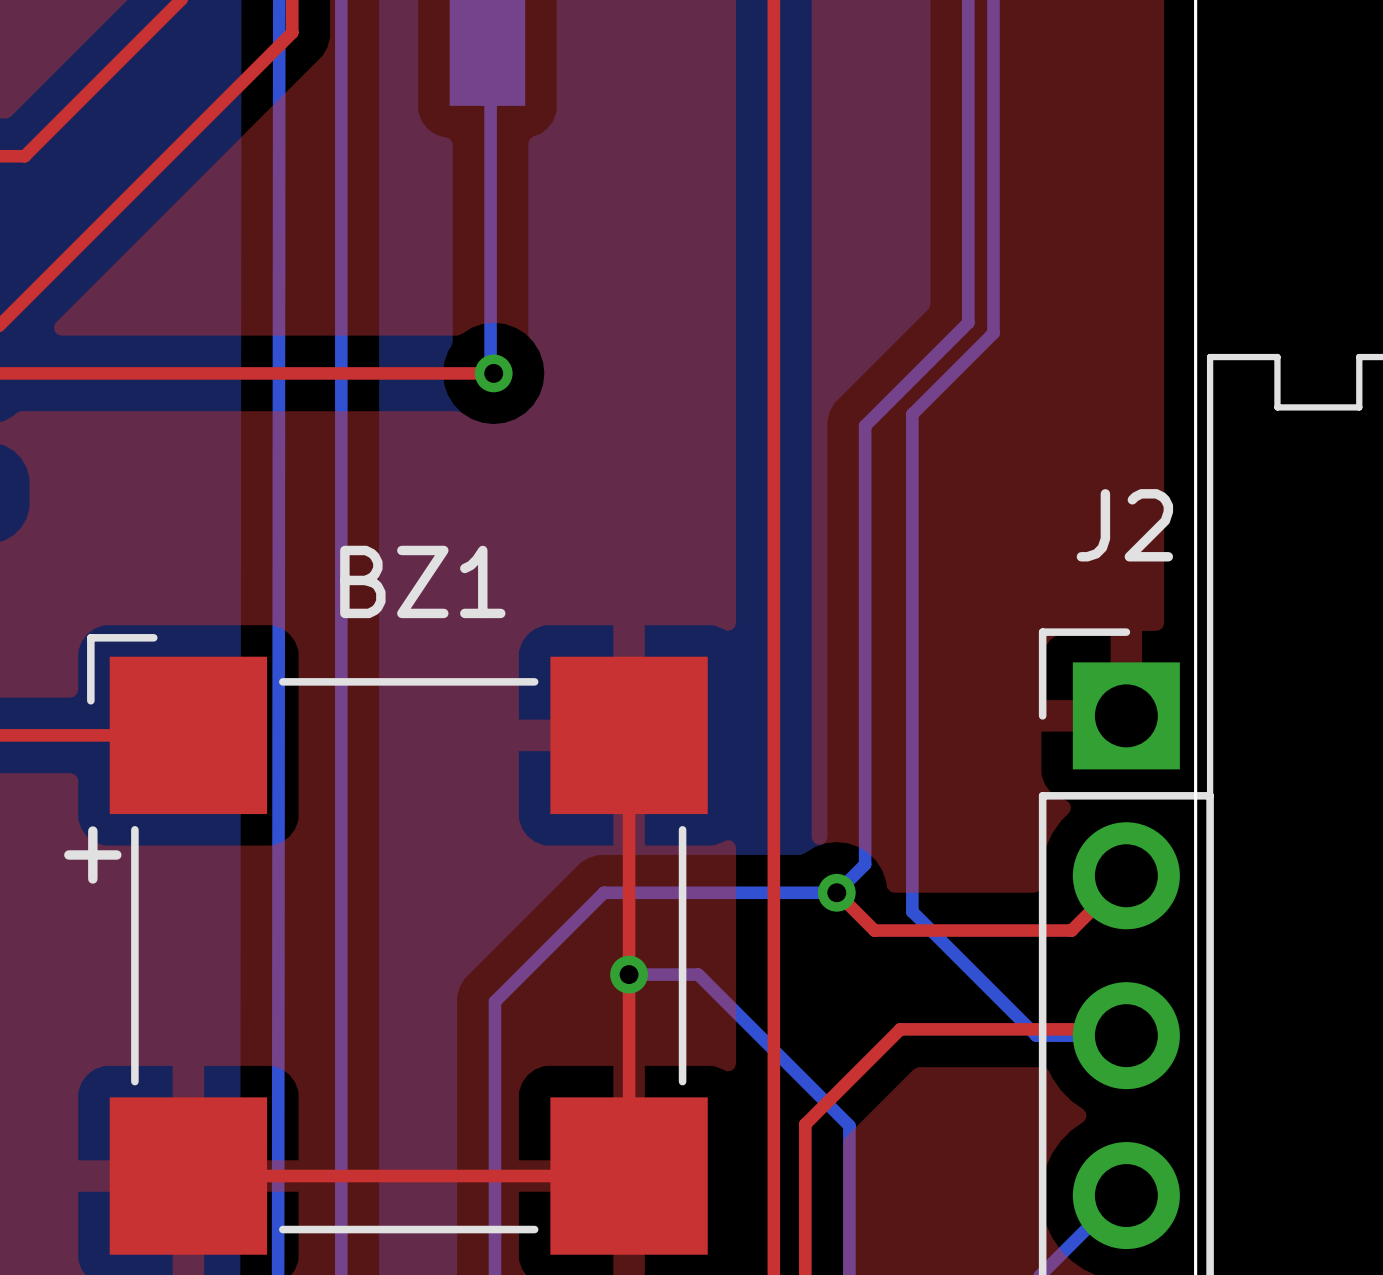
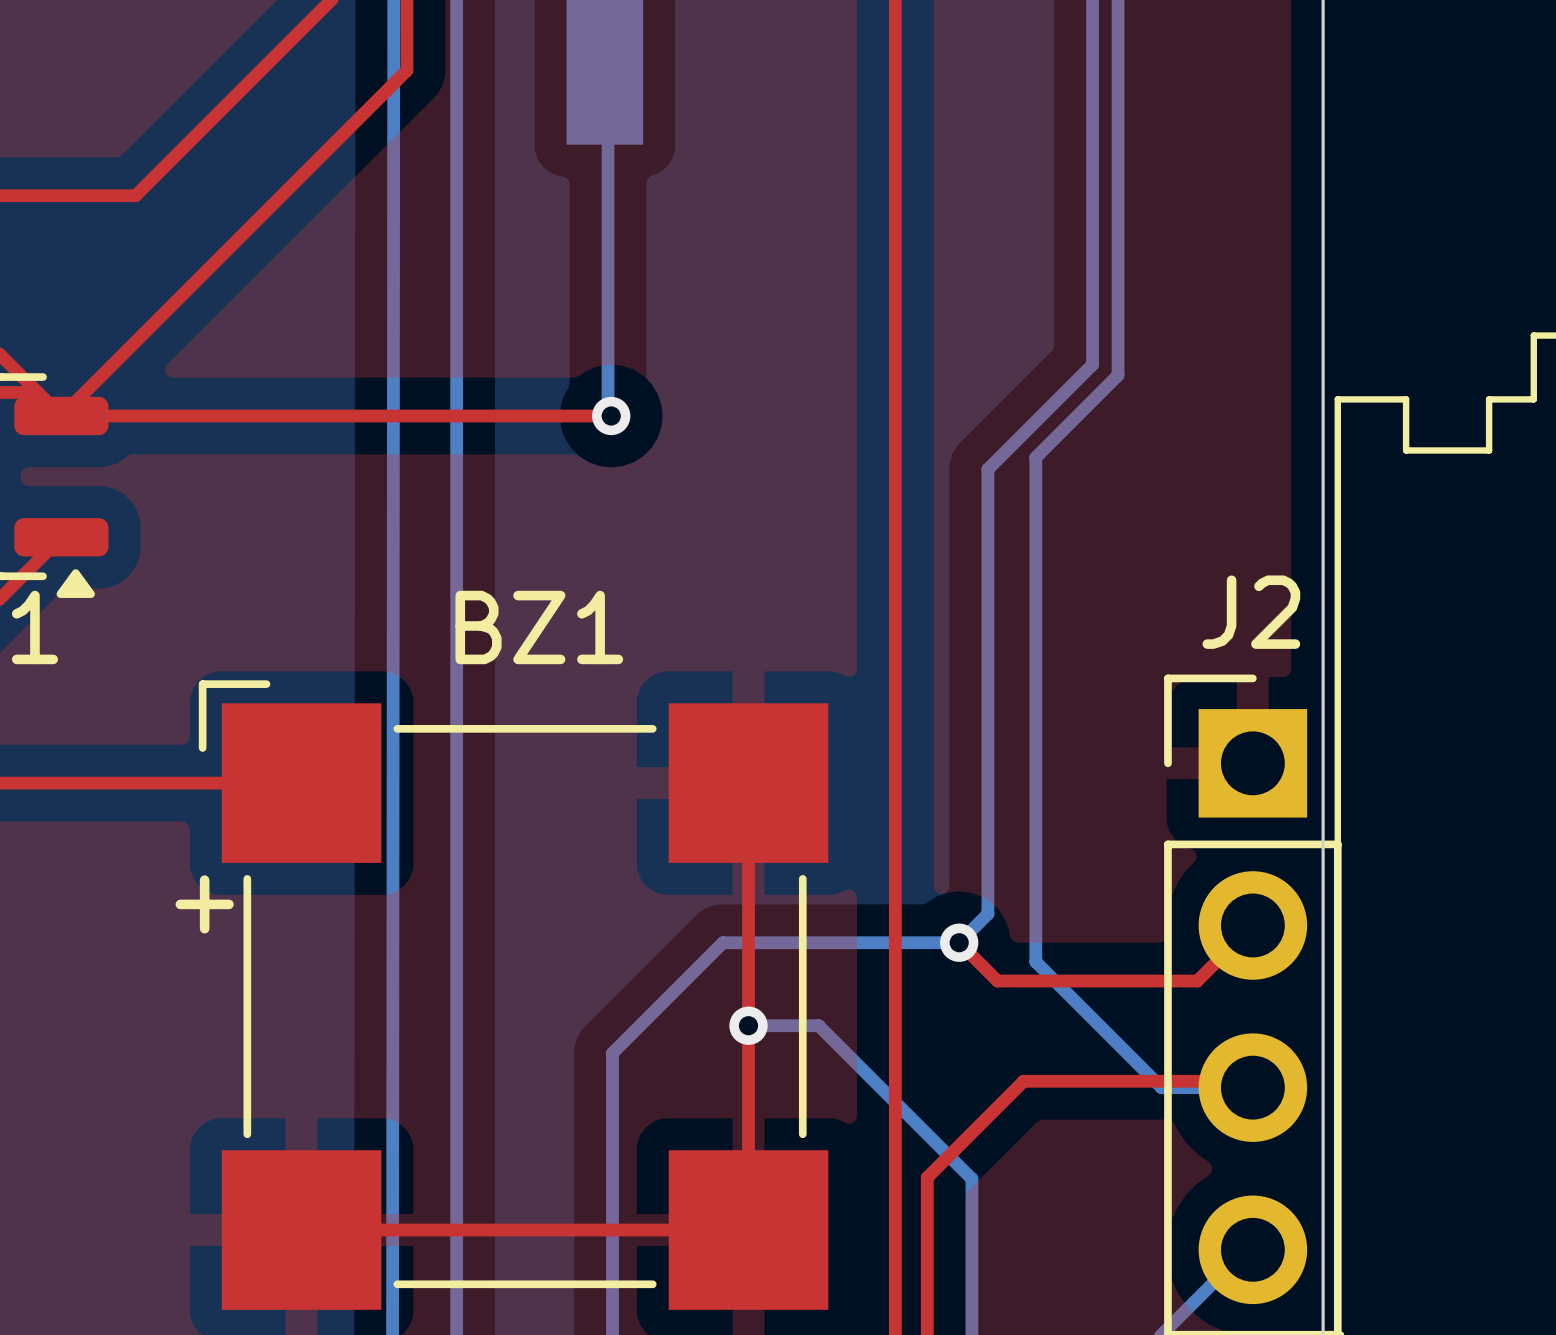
J2 name position: J2 (1124, 525) -> J2 (1251, 612)

